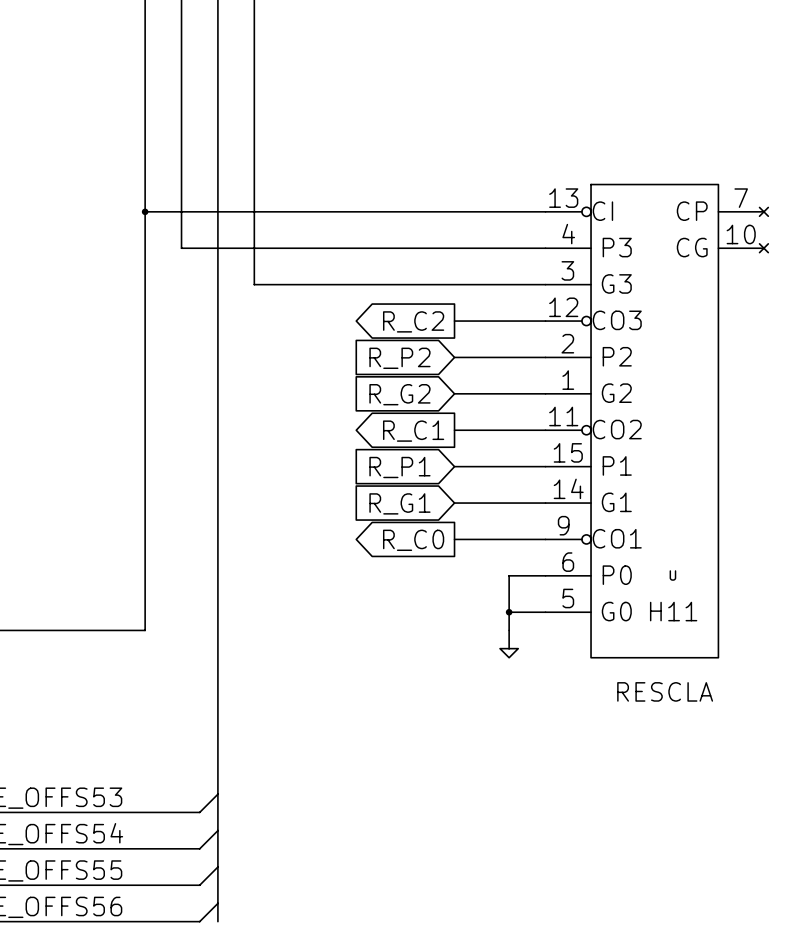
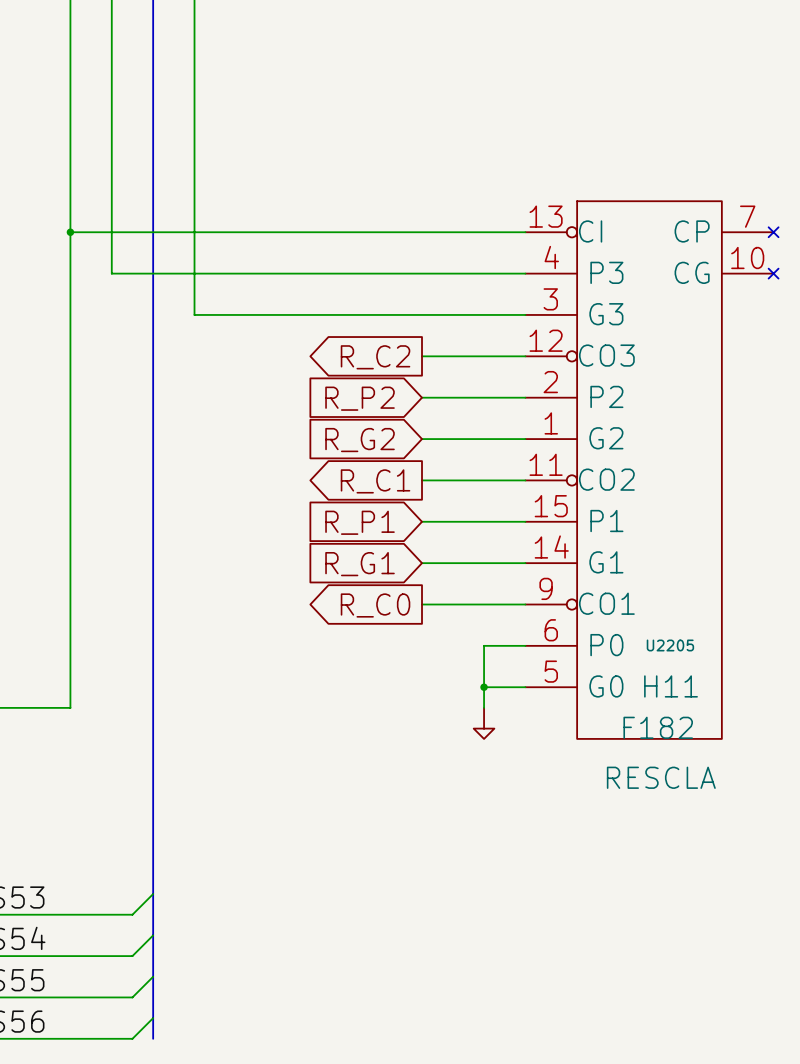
U name: U (672, 575) -> U2205 (670, 645)
U value: none -> F182 (658, 727)

